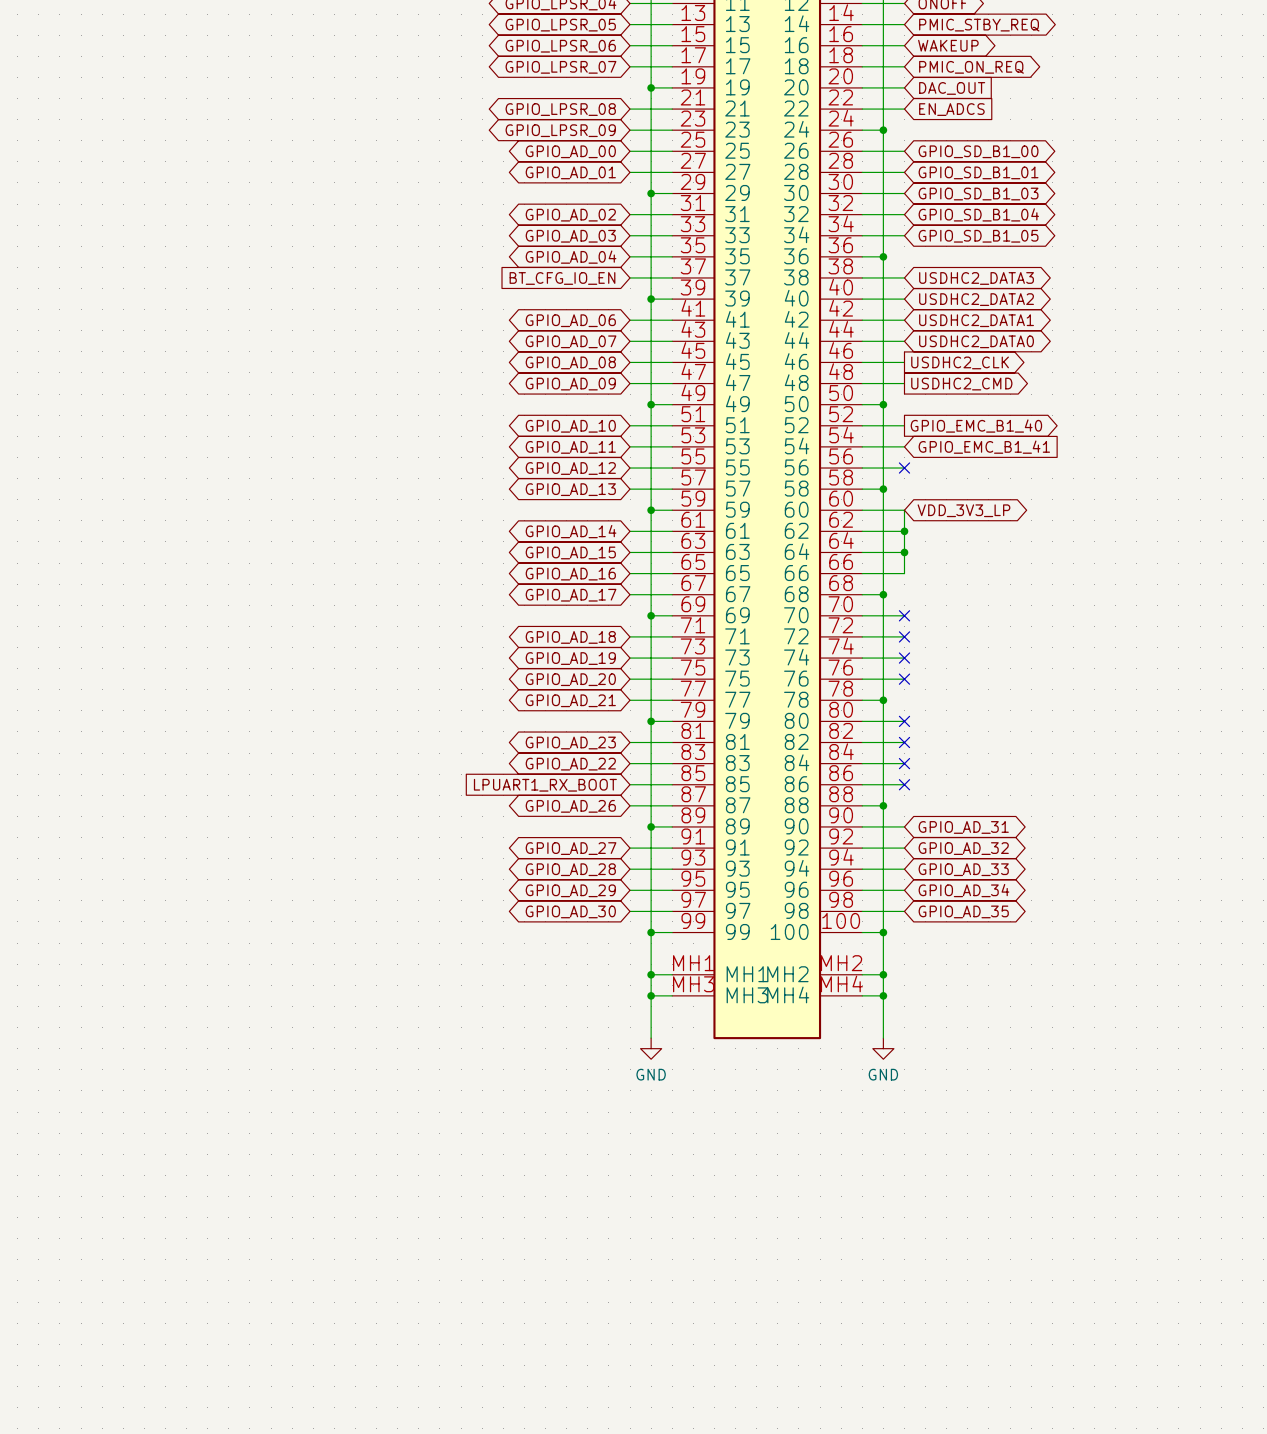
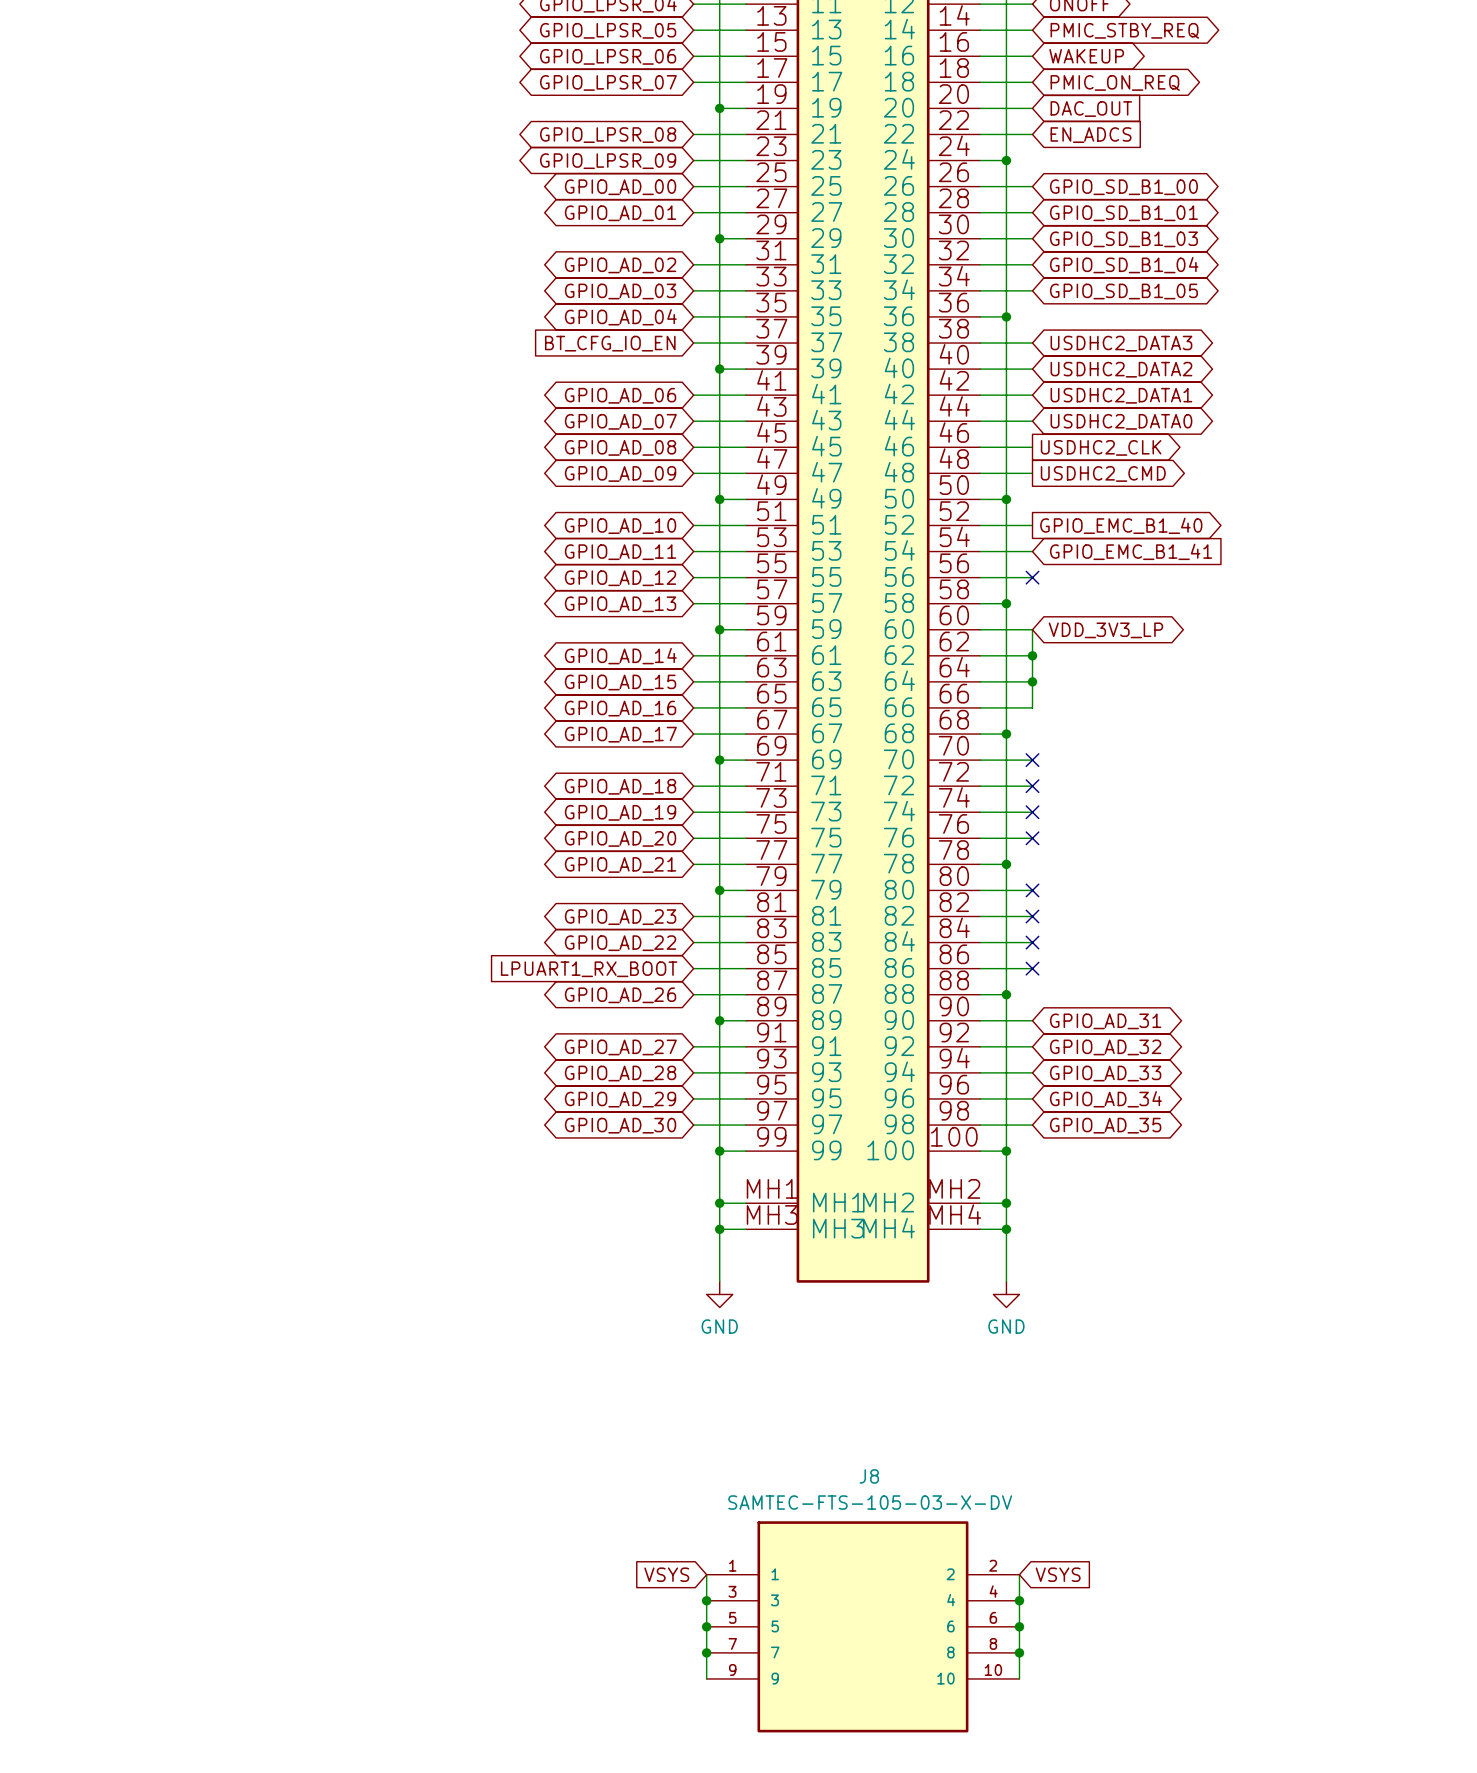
global label: none -> VSYS (666, 1574)
wire: none -> (706, 1574) (706, 1678)
wire: none -> (1019, 1574) (1019, 1678)
global label: none -> VSYS (1058, 1574)
junction: none -> (706, 1600)
junction: none -> (1019, 1600)
junction: none -> (706, 1626)
J8: none -> SAMTEC-FTS-105-03-X-DV (863, 1626)
junction: none -> (1019, 1626)
junction: none -> (706, 1652)
junction: none -> (1019, 1652)

